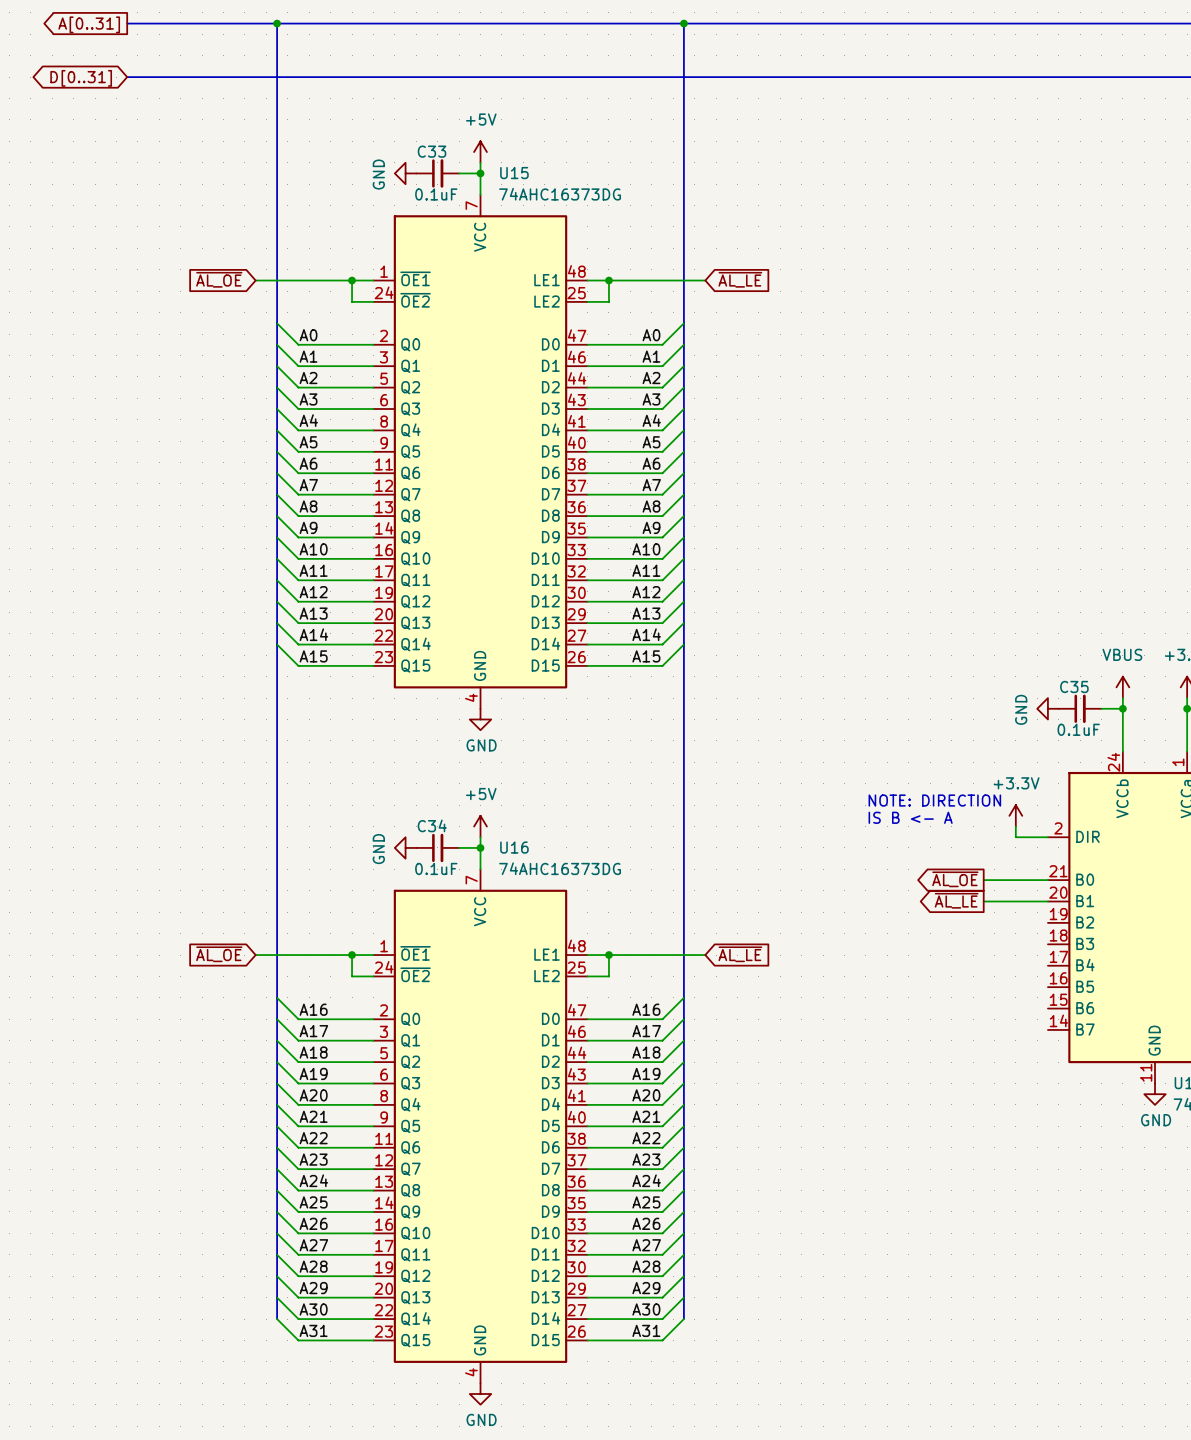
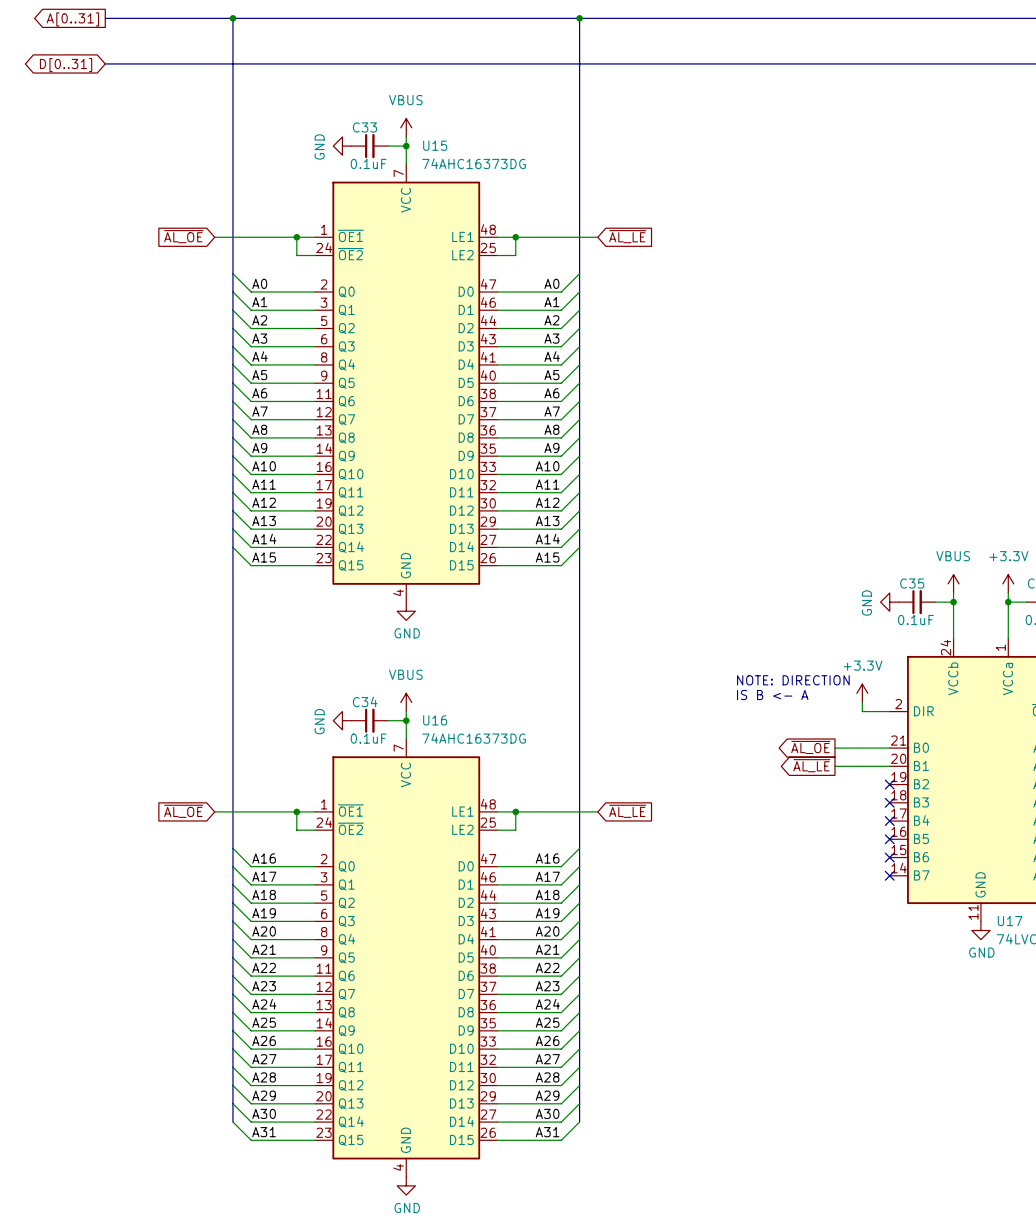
power symbol: +5V (480, 152) -> VBUS (406, 127)
power symbol: +5V (480, 826) -> VBUS (406, 702)
no-connect mark: none -> (889, 784)
no-connect mark: none -> (889, 802)
no-connect mark: none -> (889, 821)
no-connect mark: none -> (889, 839)
no-connect mark: none -> (889, 857)
no-connect mark: none -> (889, 875)

